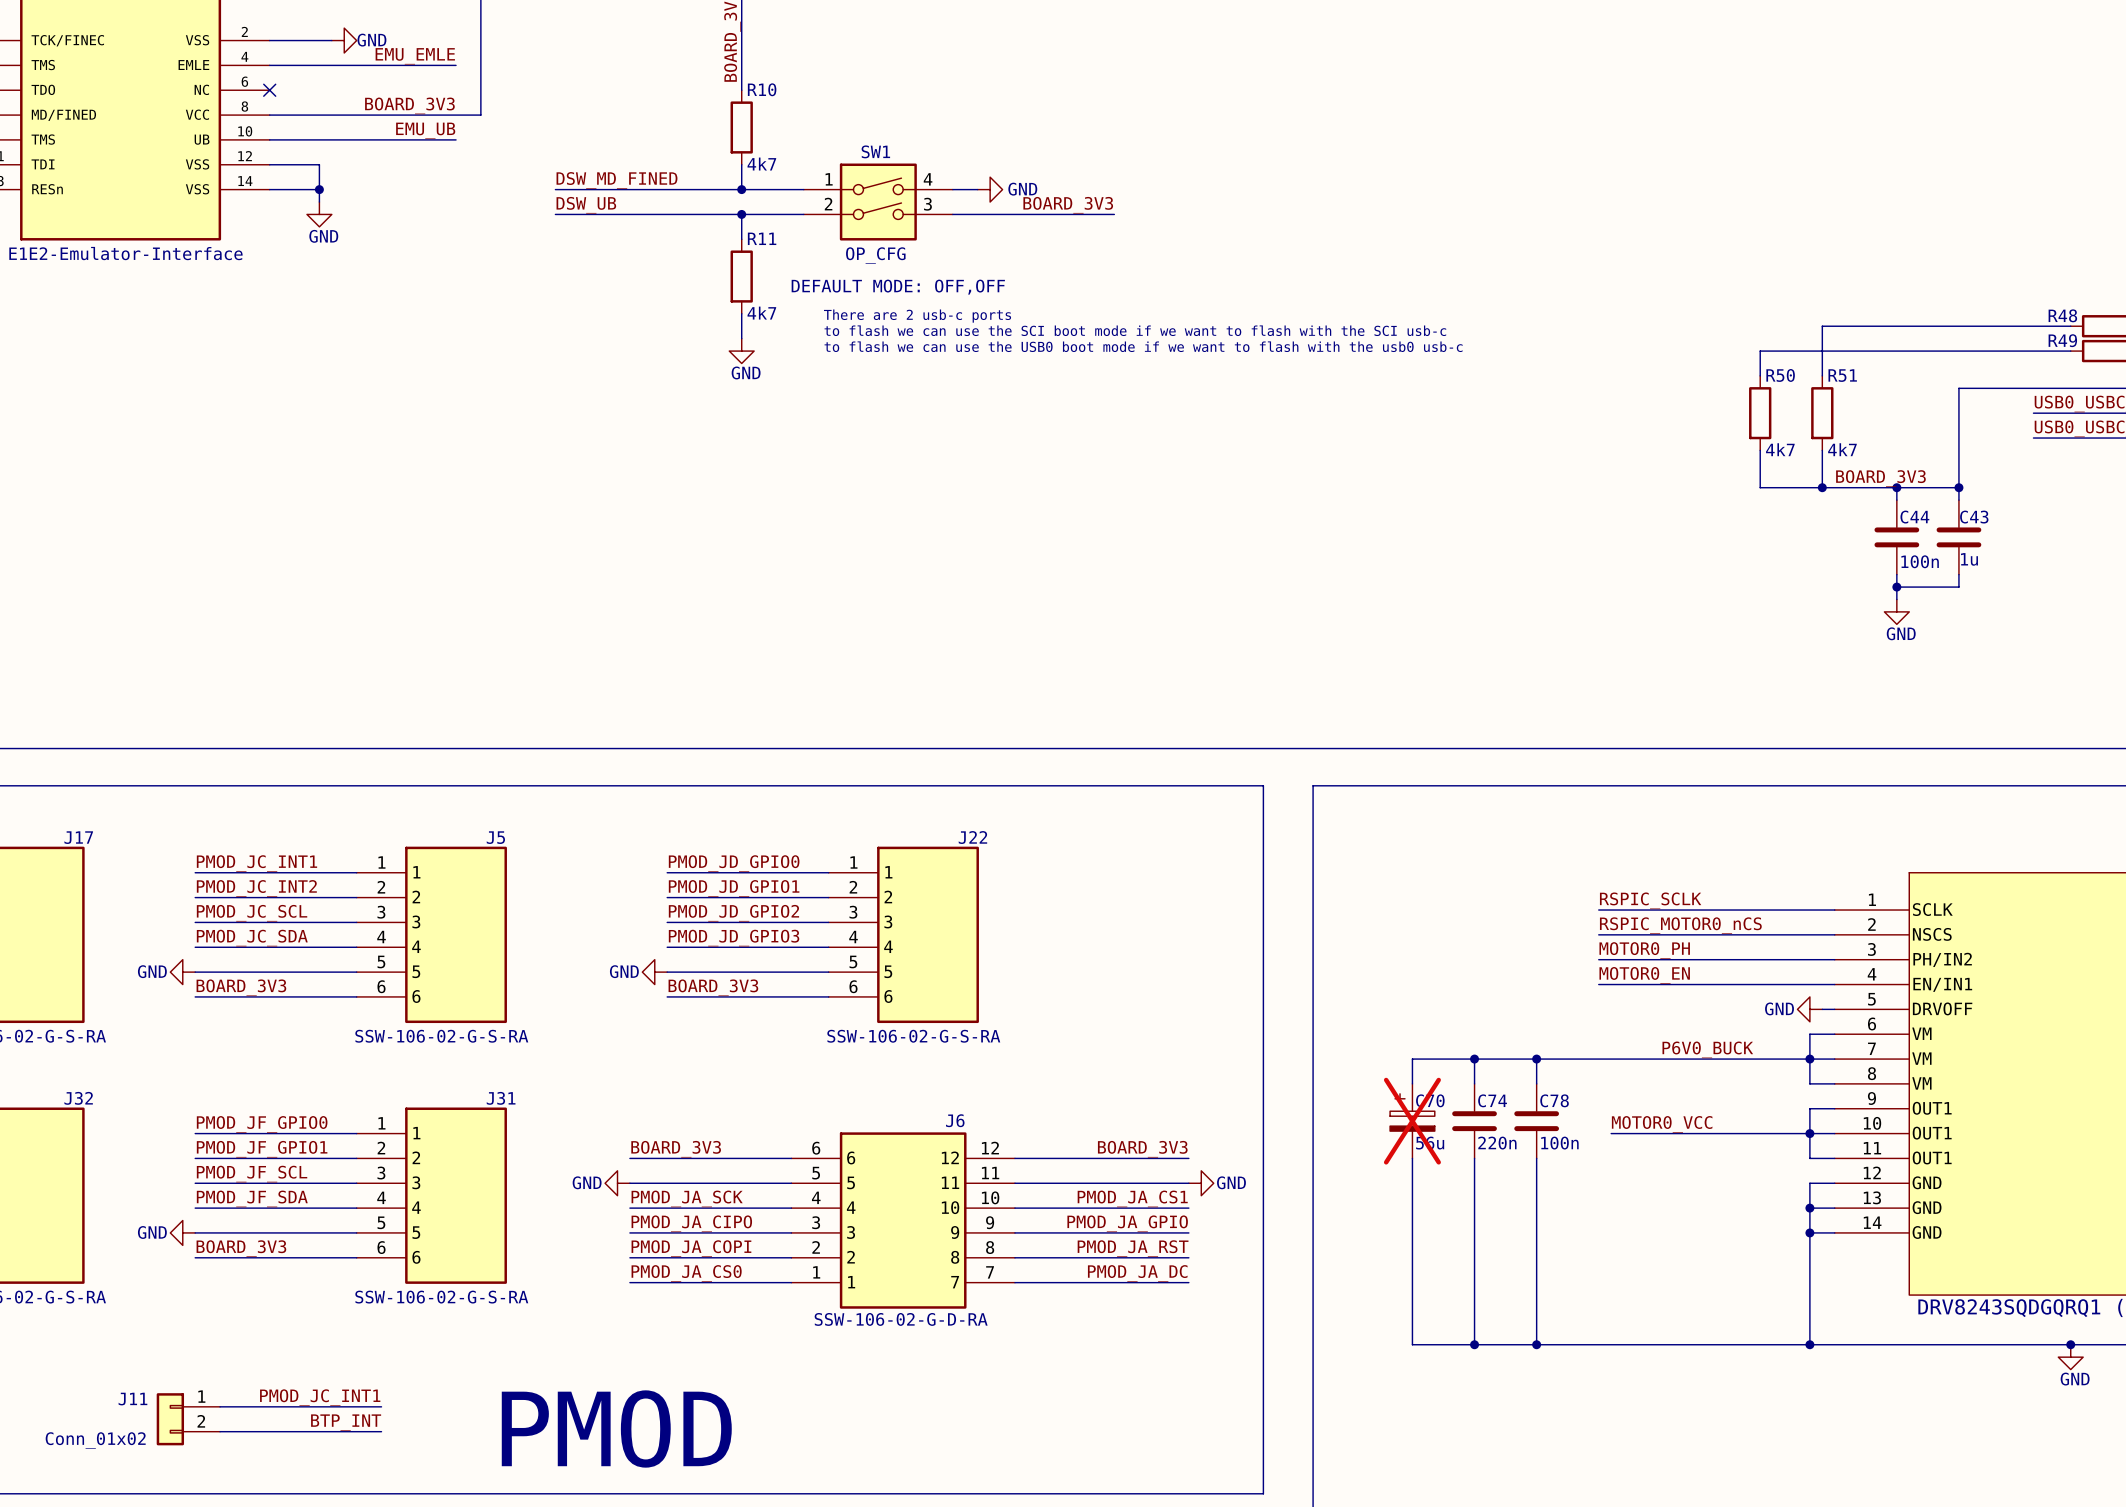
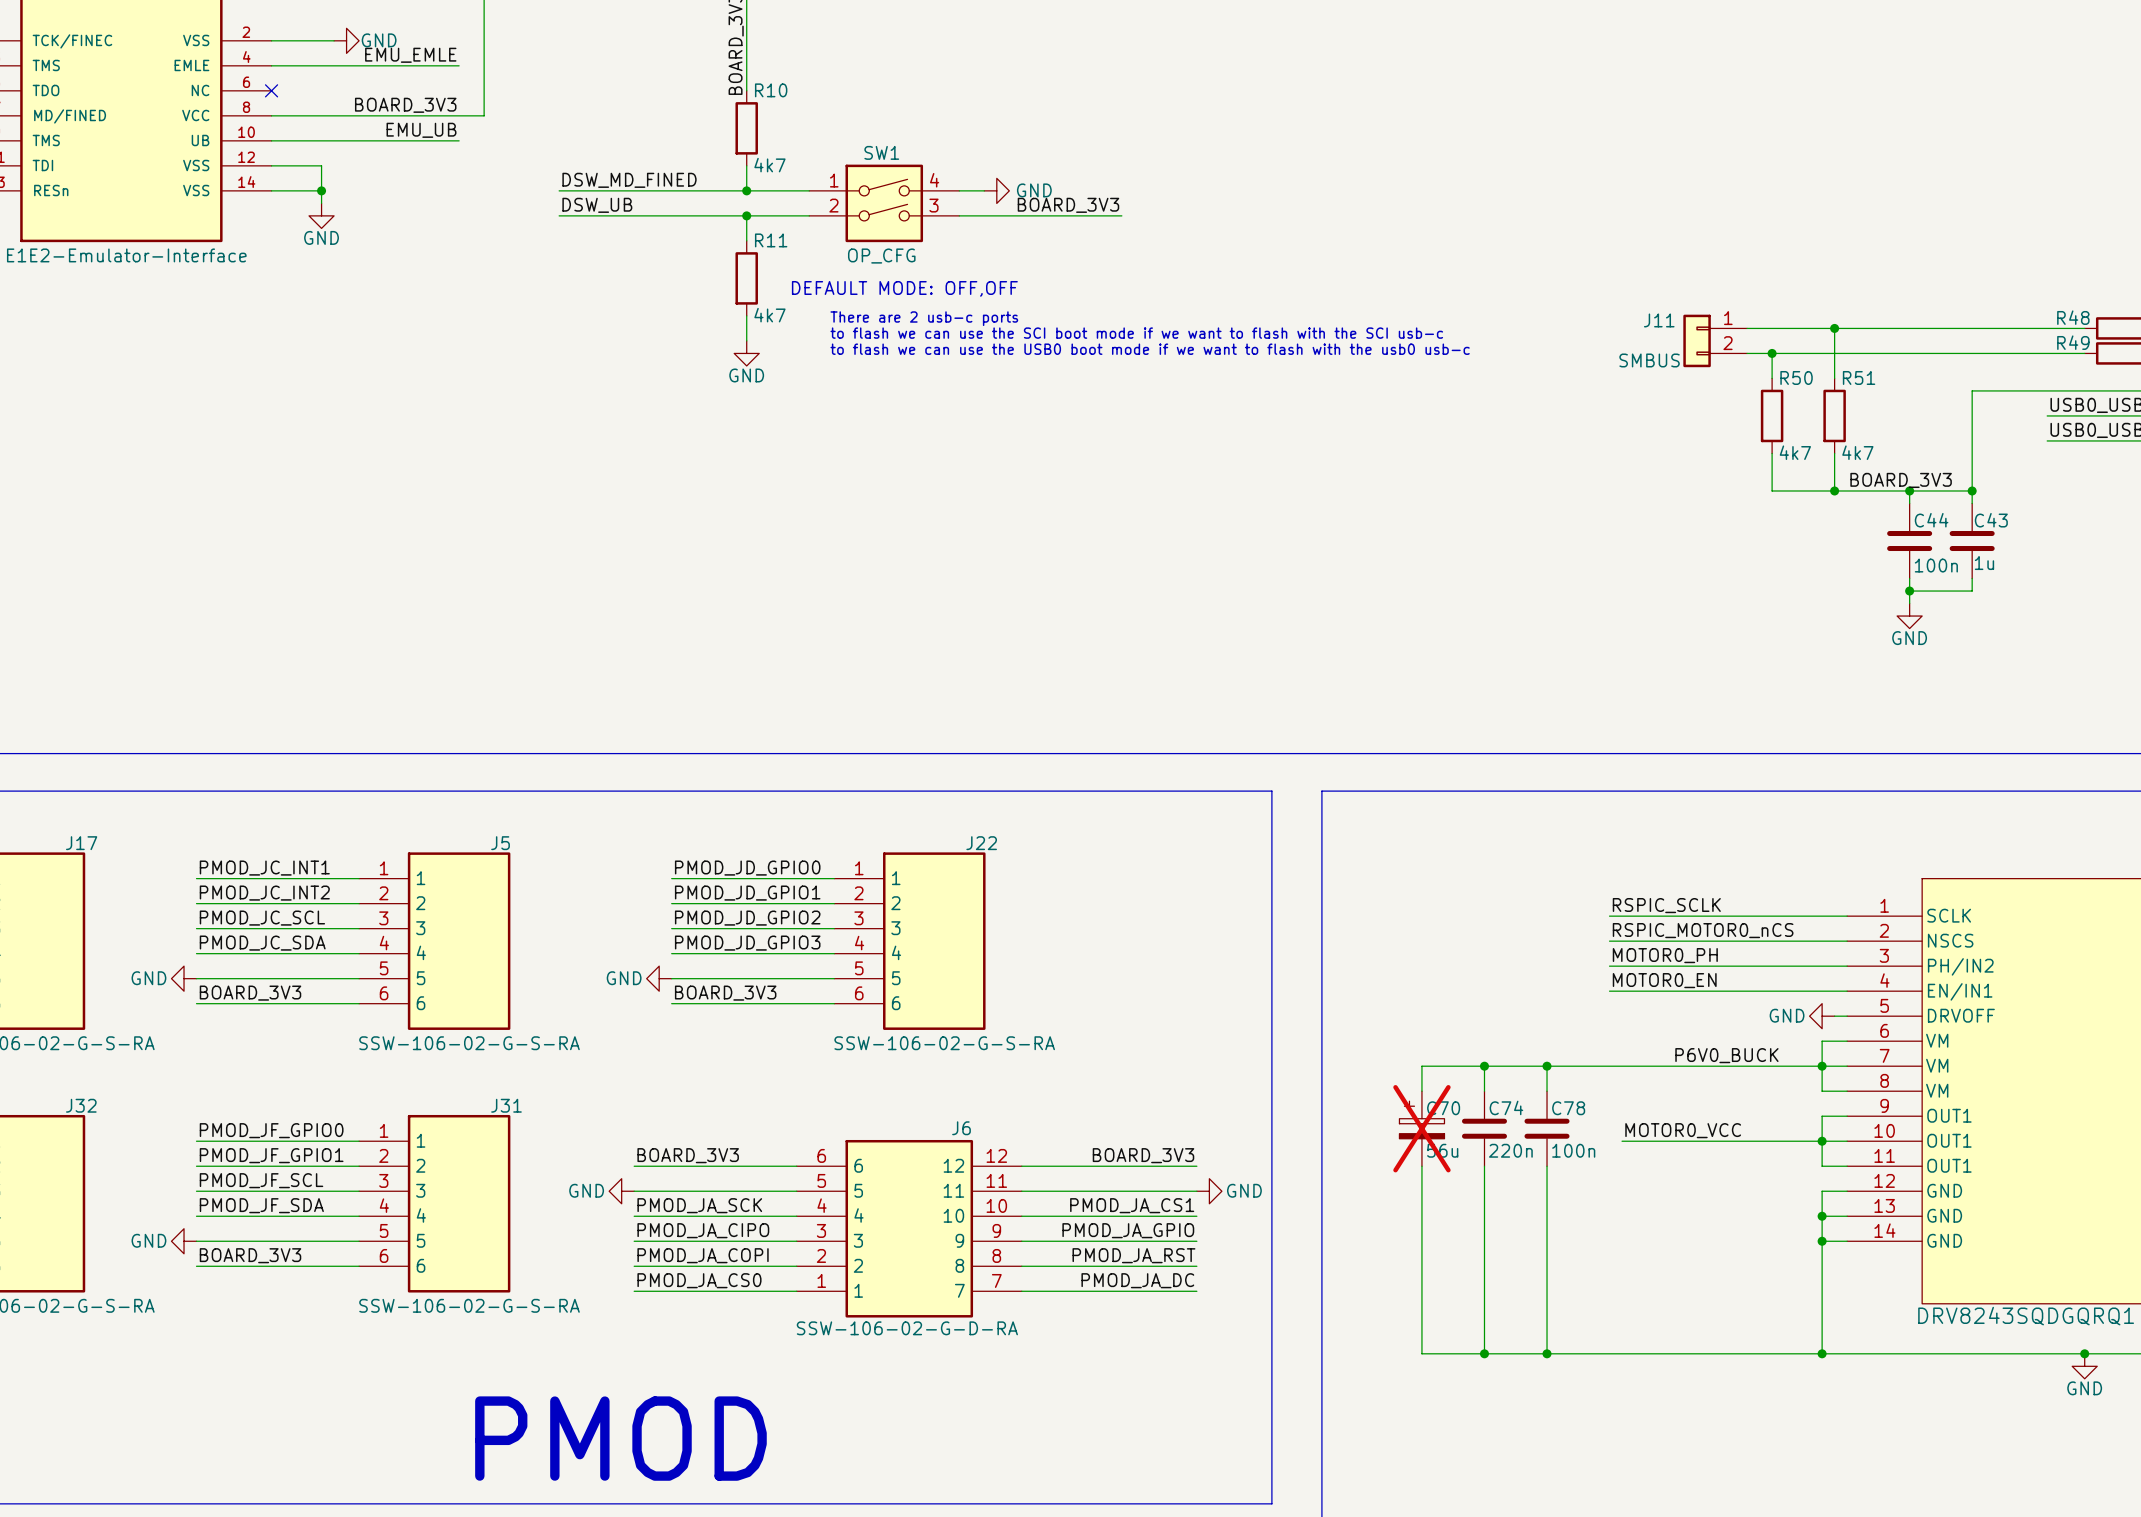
wire: none -> (1747, 328) (1834, 328)
junction: none -> (1834, 328)
wire: none -> (1747, 353) (1772, 353)
junction: none -> (1772, 353)
label: PMOD_JC_INT1 (320, 1397) -> none
wire: (220, 1406) (381, 1406) -> none
J11 position: (188, 1419) -> (1715, 340)
label: BTP_INT (346, 1422) -> none
wire: (220, 1431) (381, 1431) -> none
J11 value: Conn_01x02 (95, 1440) -> SMBUS (1649, 360)

